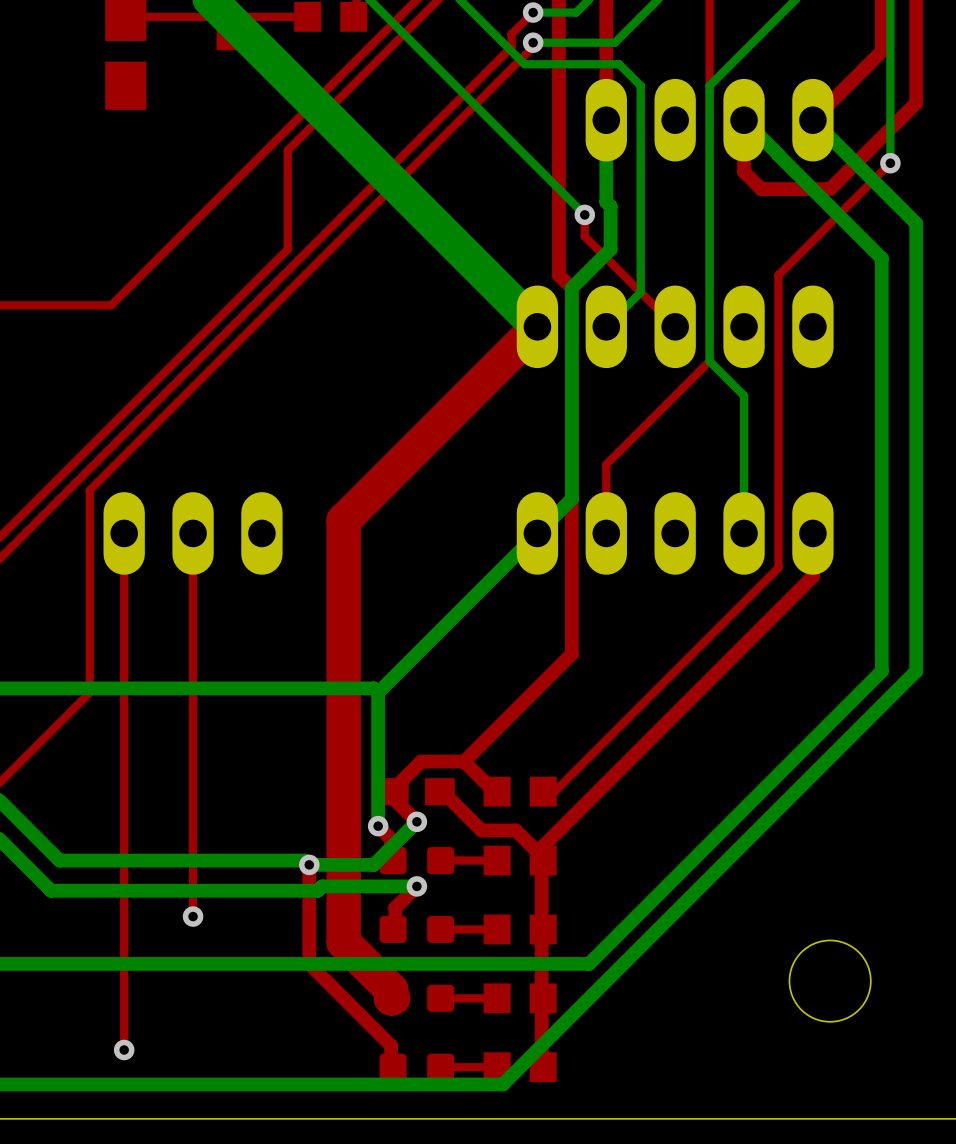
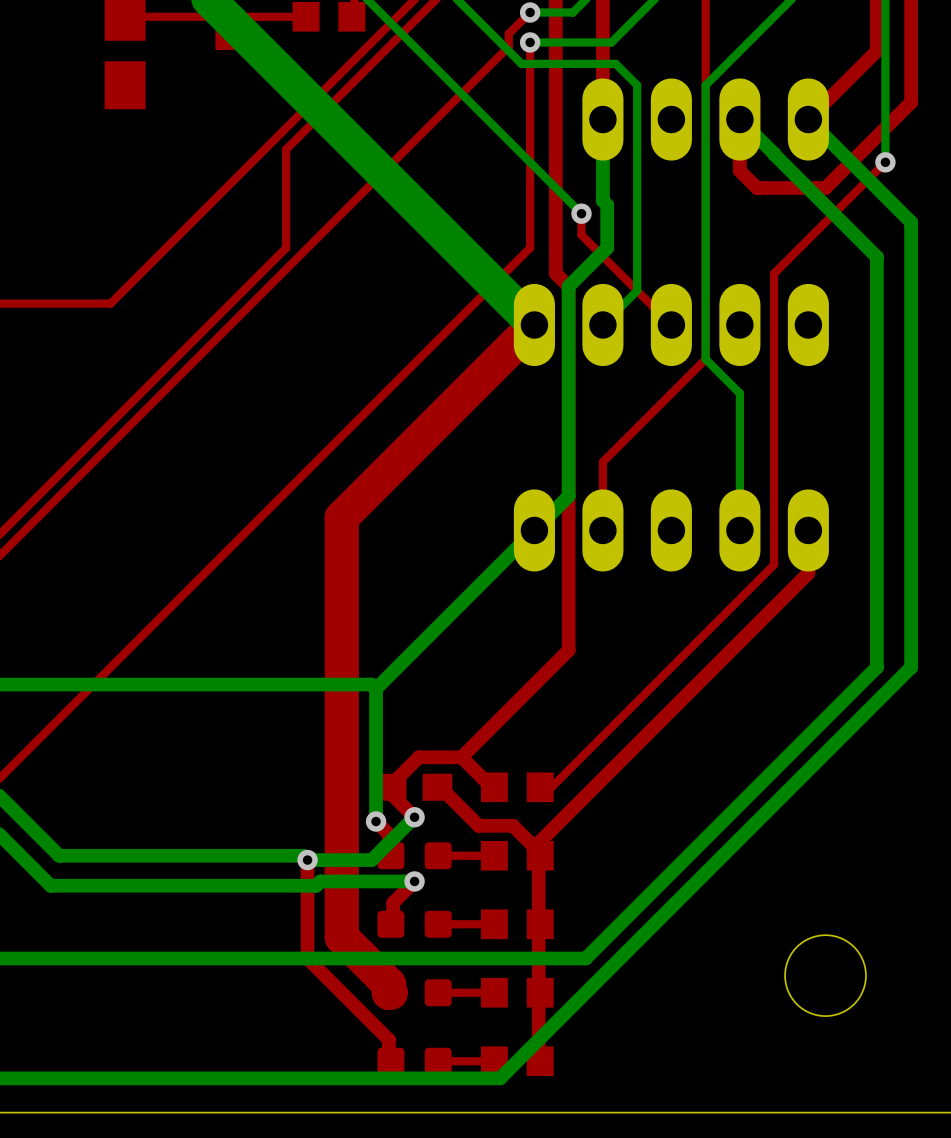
top track: (533, 47) (89, 490) (89, 692) -> (530, 46) (530, 247) (89, 688)
top track: (124, 533) (124, 1049) -> none
top track: (193, 533) (193, 916) -> none
part: (193, 533) -> none
via: (193, 916) -> none
via: (124, 1049) -> none

